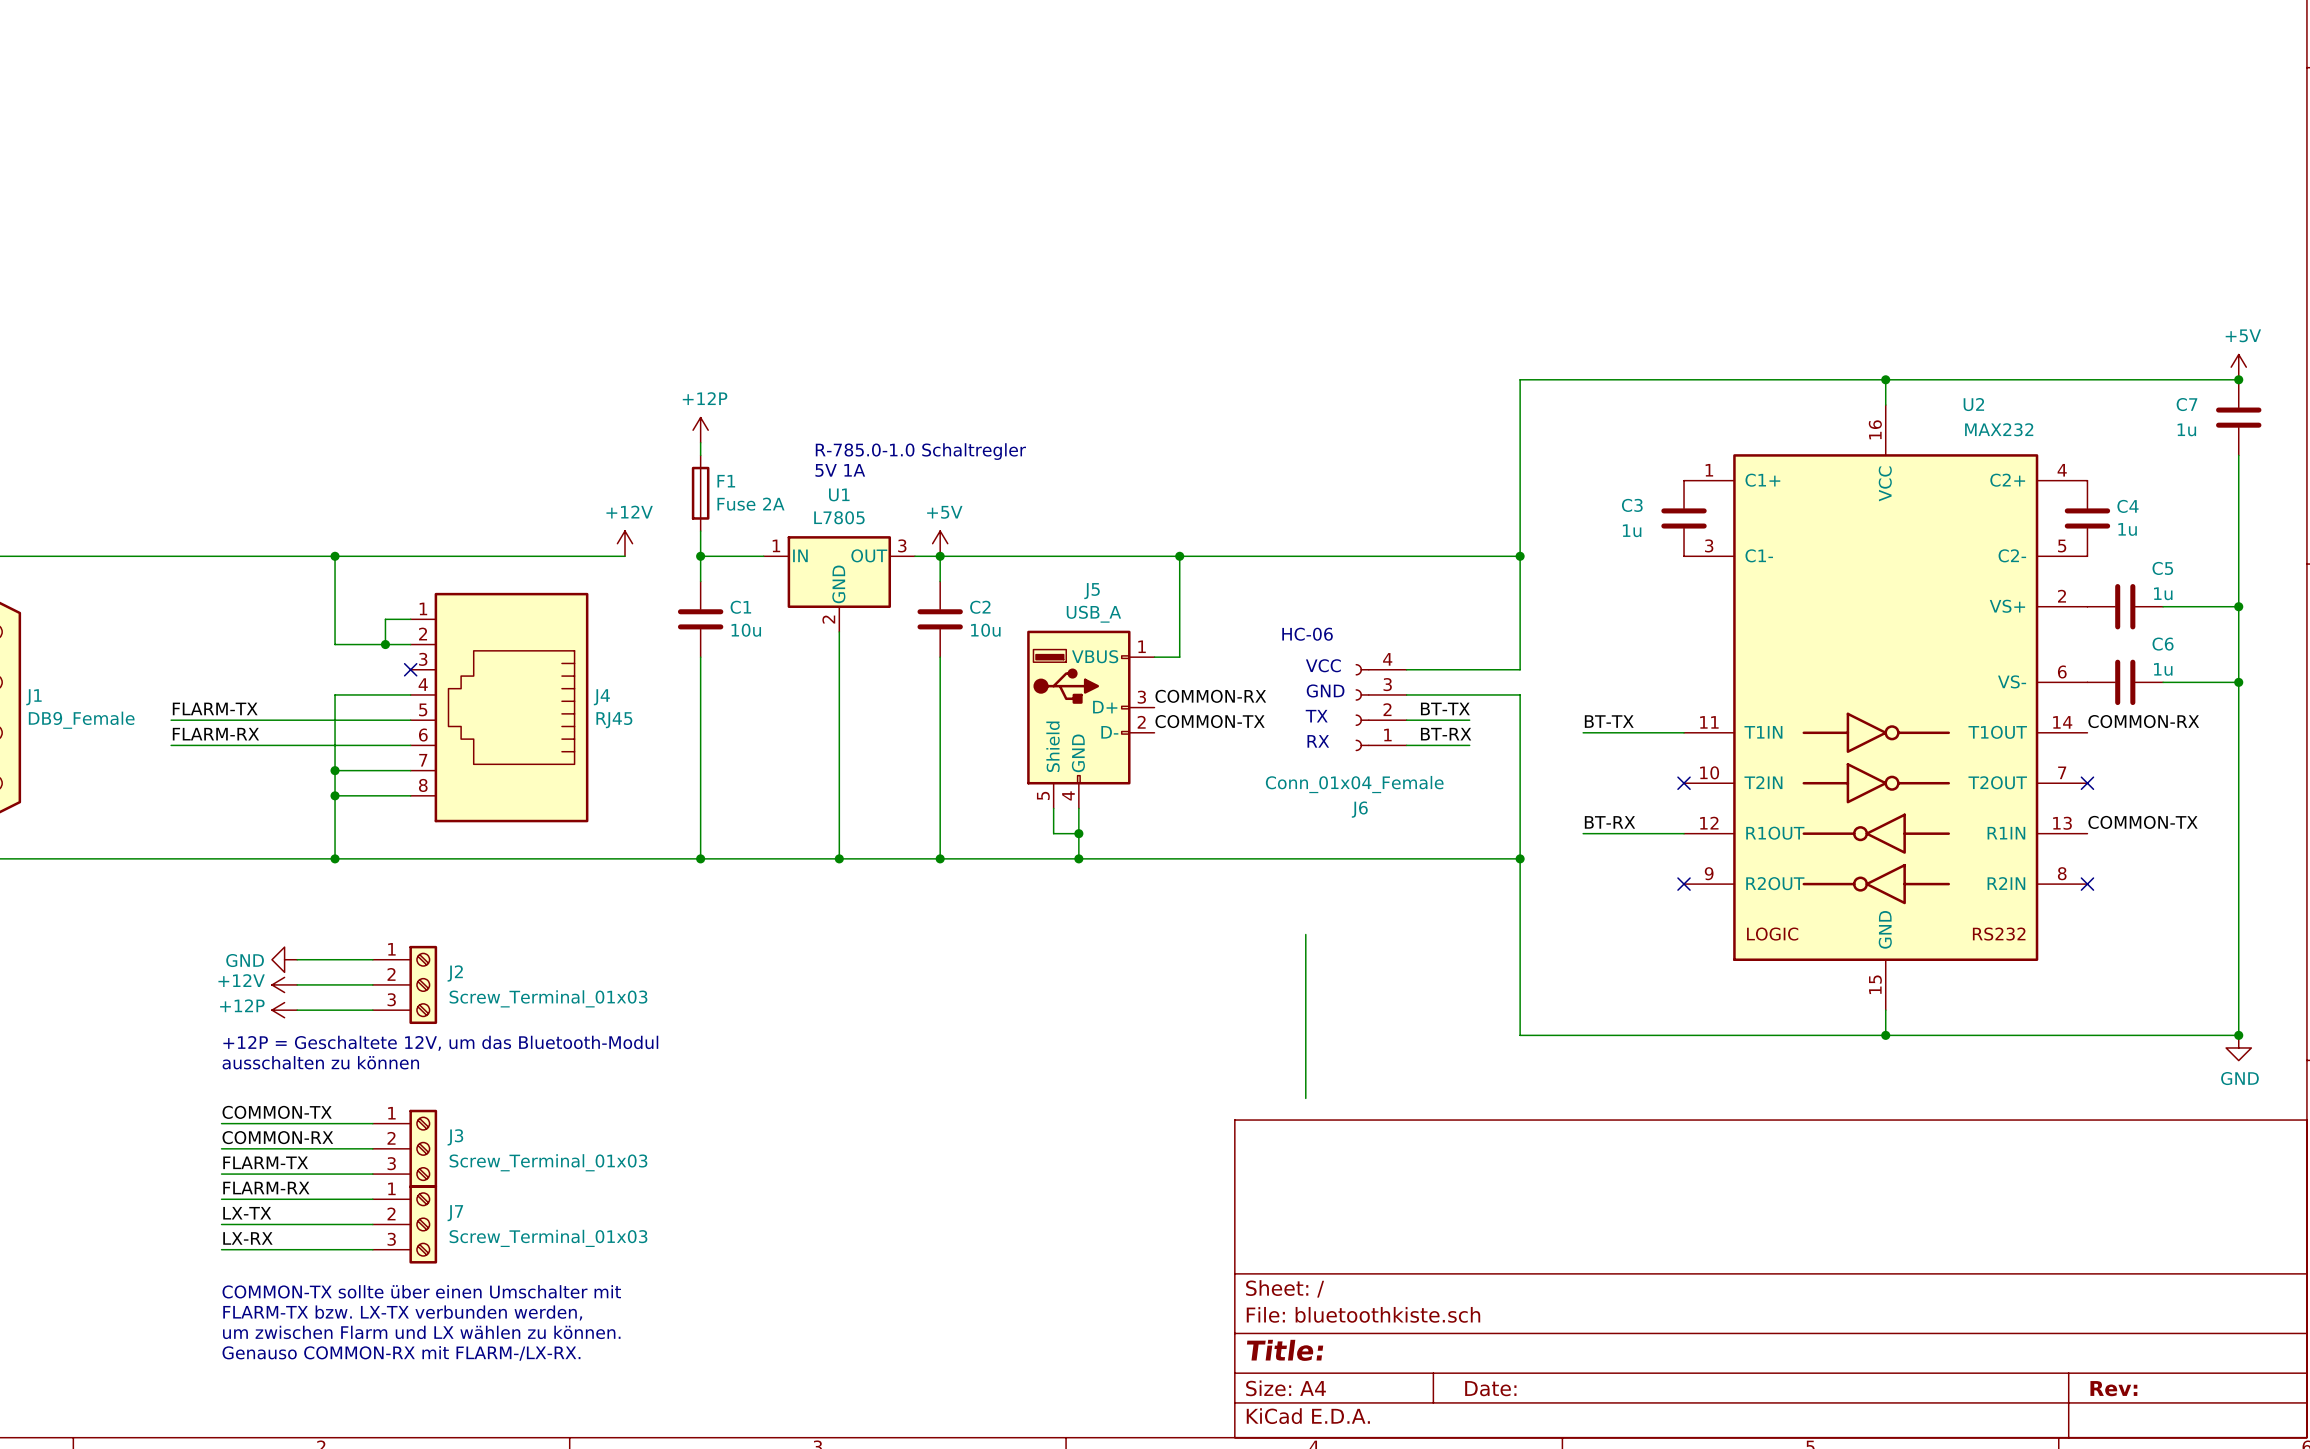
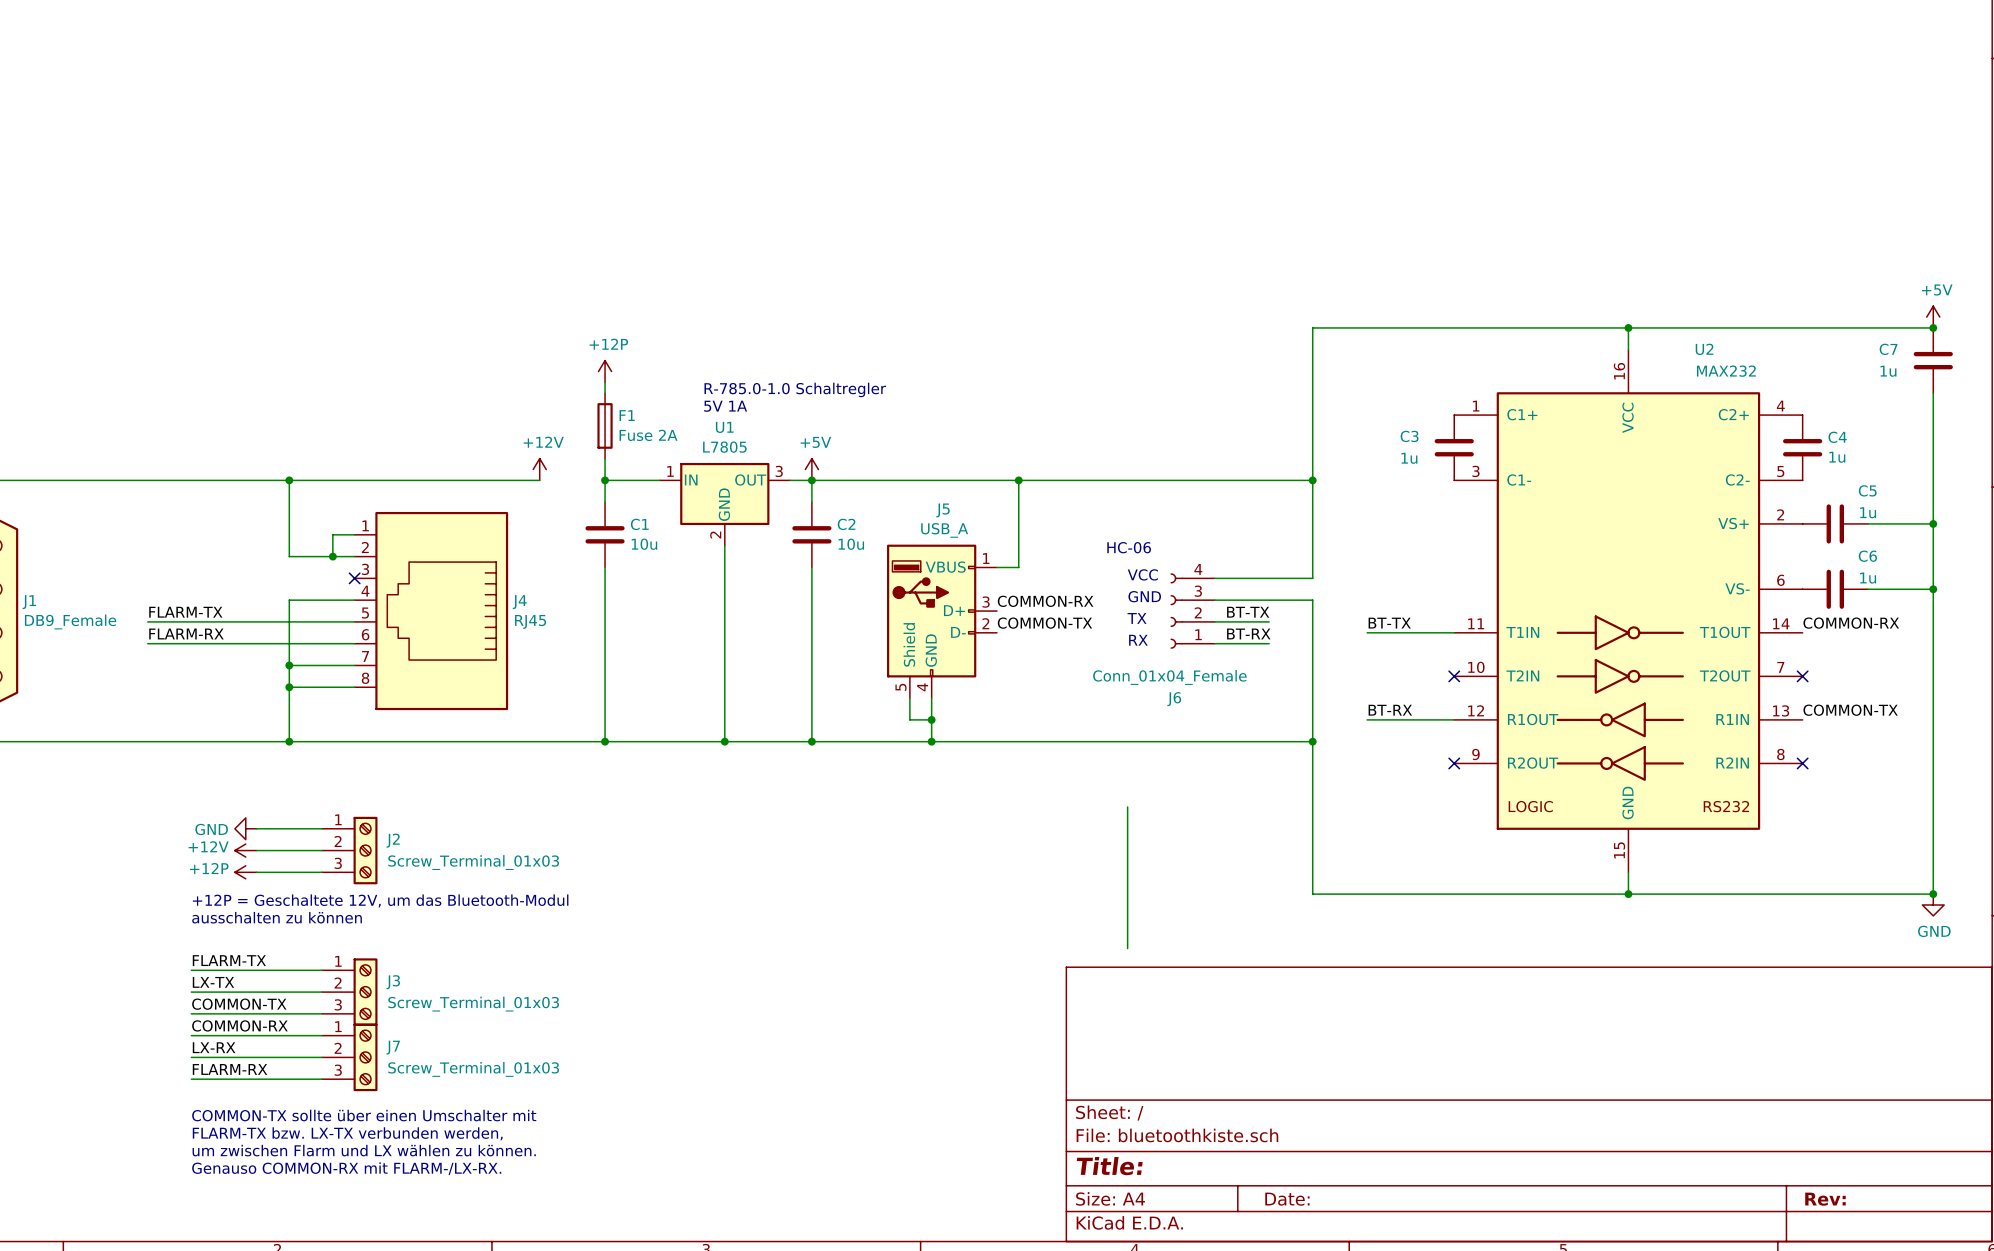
label: COMMON-TX (277, 1112) -> FLARM-TX (229, 960)
label: COMMON-RX (277, 1137) -> LX-TX (213, 982)
label: FLARM-TX (265, 1162) -> COMMON-TX (239, 1004)
label: FLARM-RX (266, 1188) -> COMMON-RX (239, 1025)
label: LX-TX (247, 1213) -> LX-RX (214, 1047)
label: LX-RX (247, 1238) -> FLARM-RX (230, 1069)

